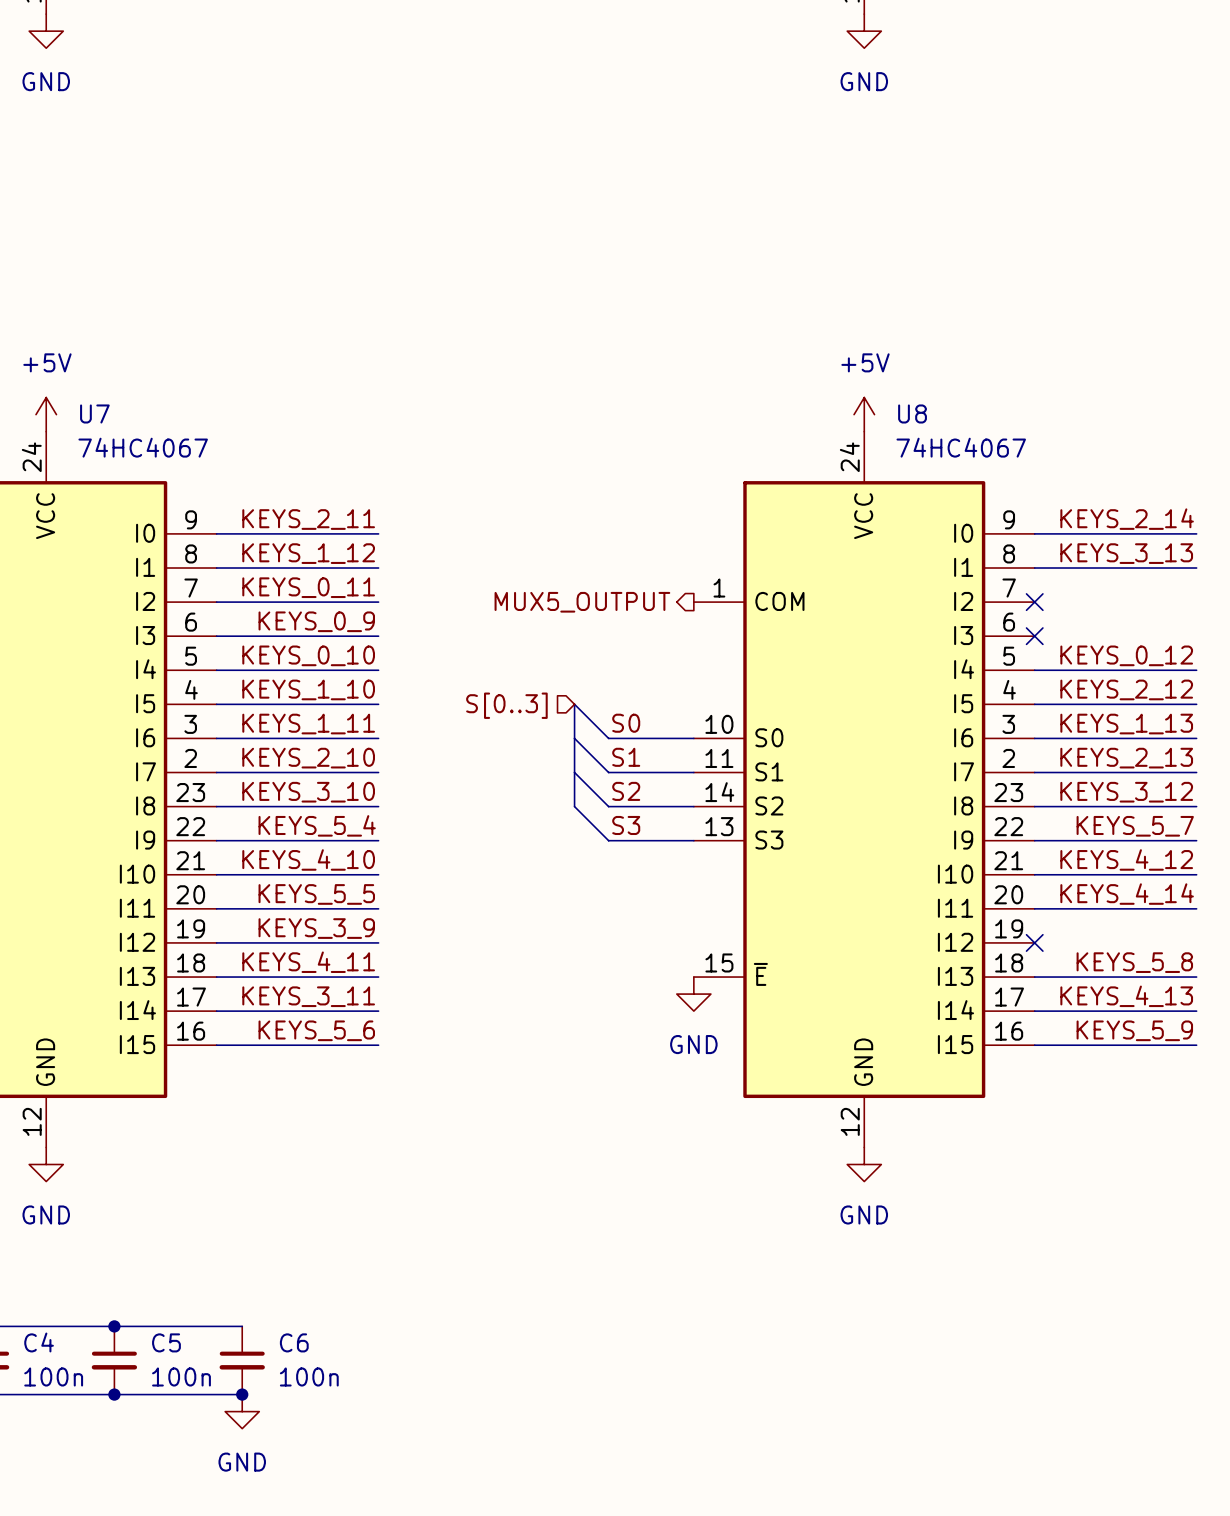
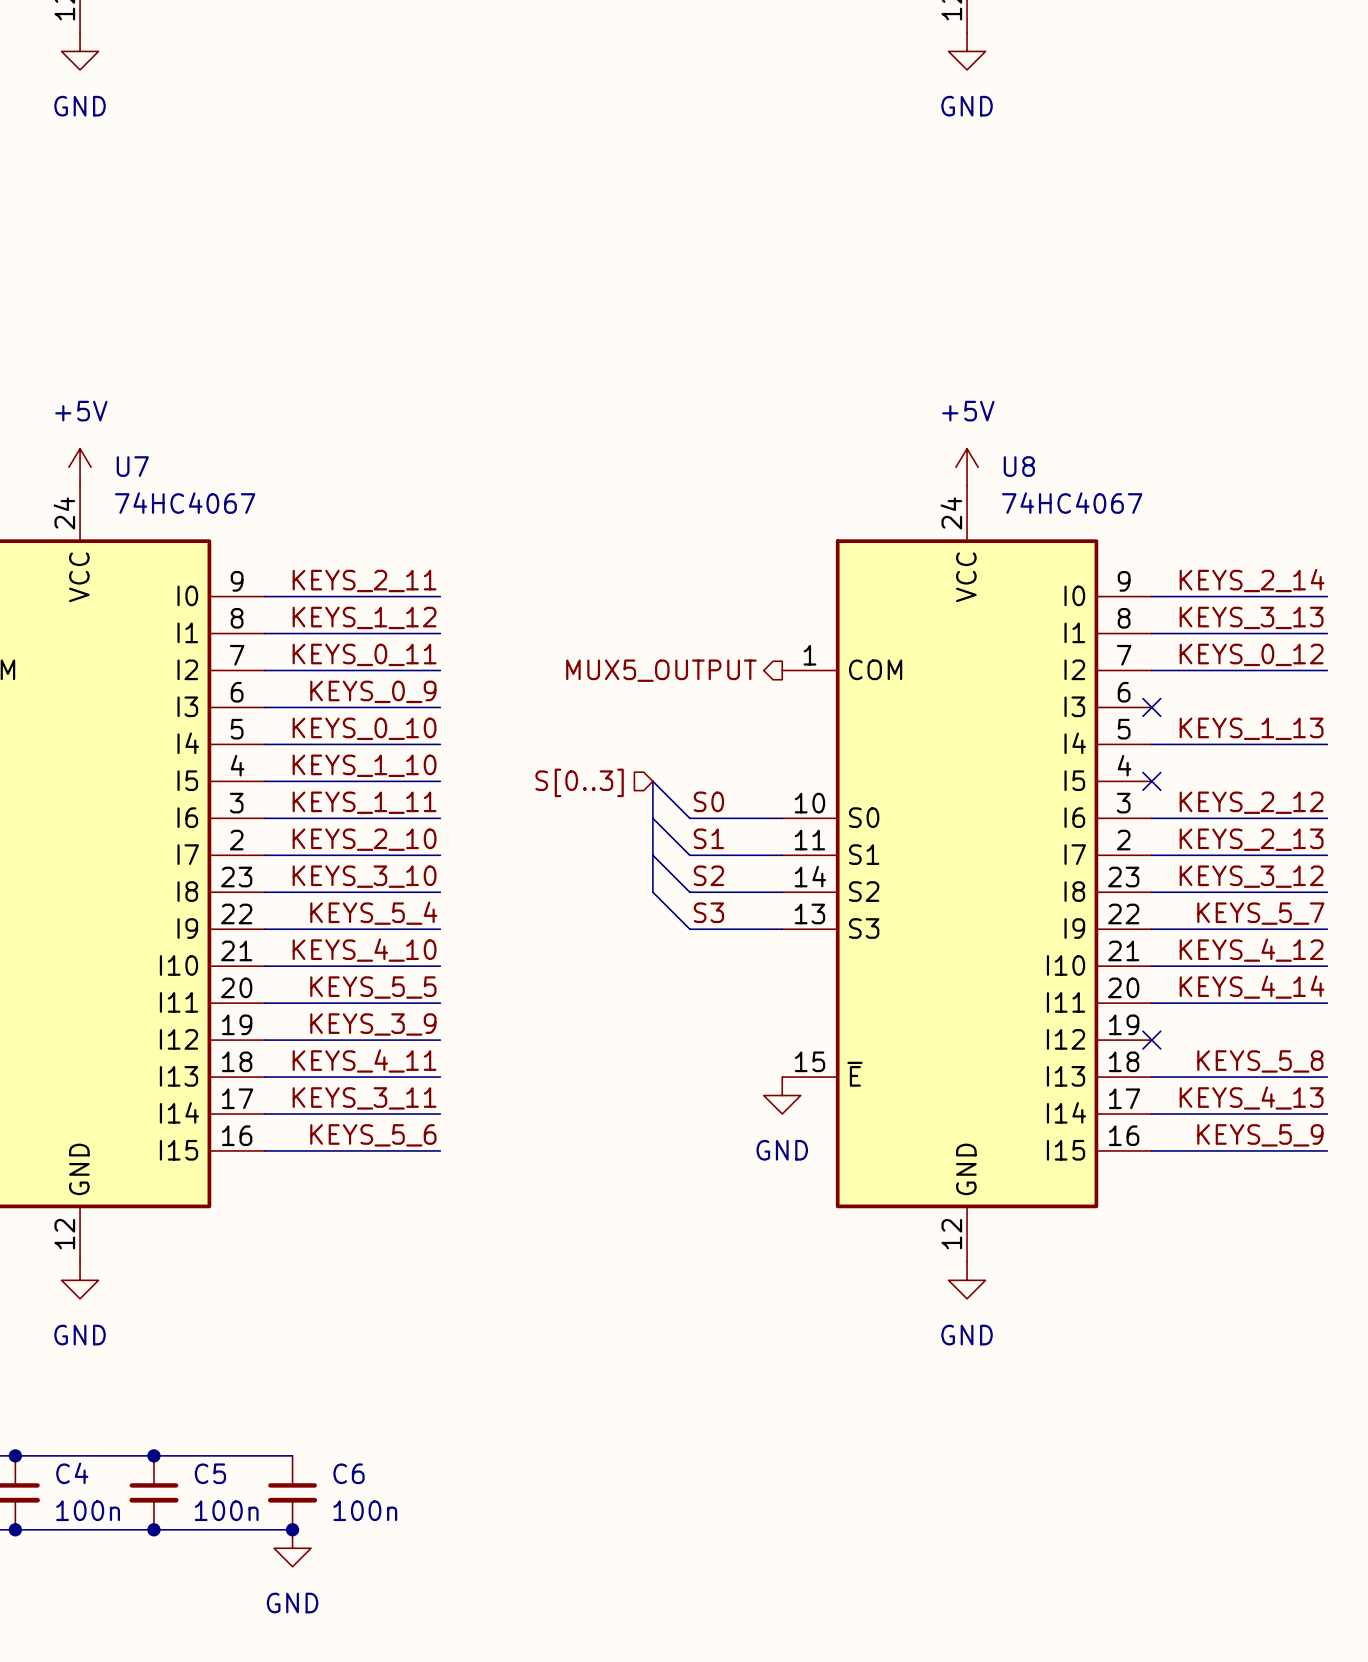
label: none -> KEYS_0_12 (1251, 654)
no-connect mark: (1034, 602) -> none
label: KEYS_0_12 (1126, 655) -> KEYS_1_13 (1251, 728)
label: KEYS_2_12 (1126, 689) -> none
wire: (1034, 704) (1196, 704) -> (1151, 670) (1327, 670)
no-connect mark: none -> (1151, 781)
label: KEYS_1_13 (1126, 724) -> KEYS_2_12 (1251, 802)

